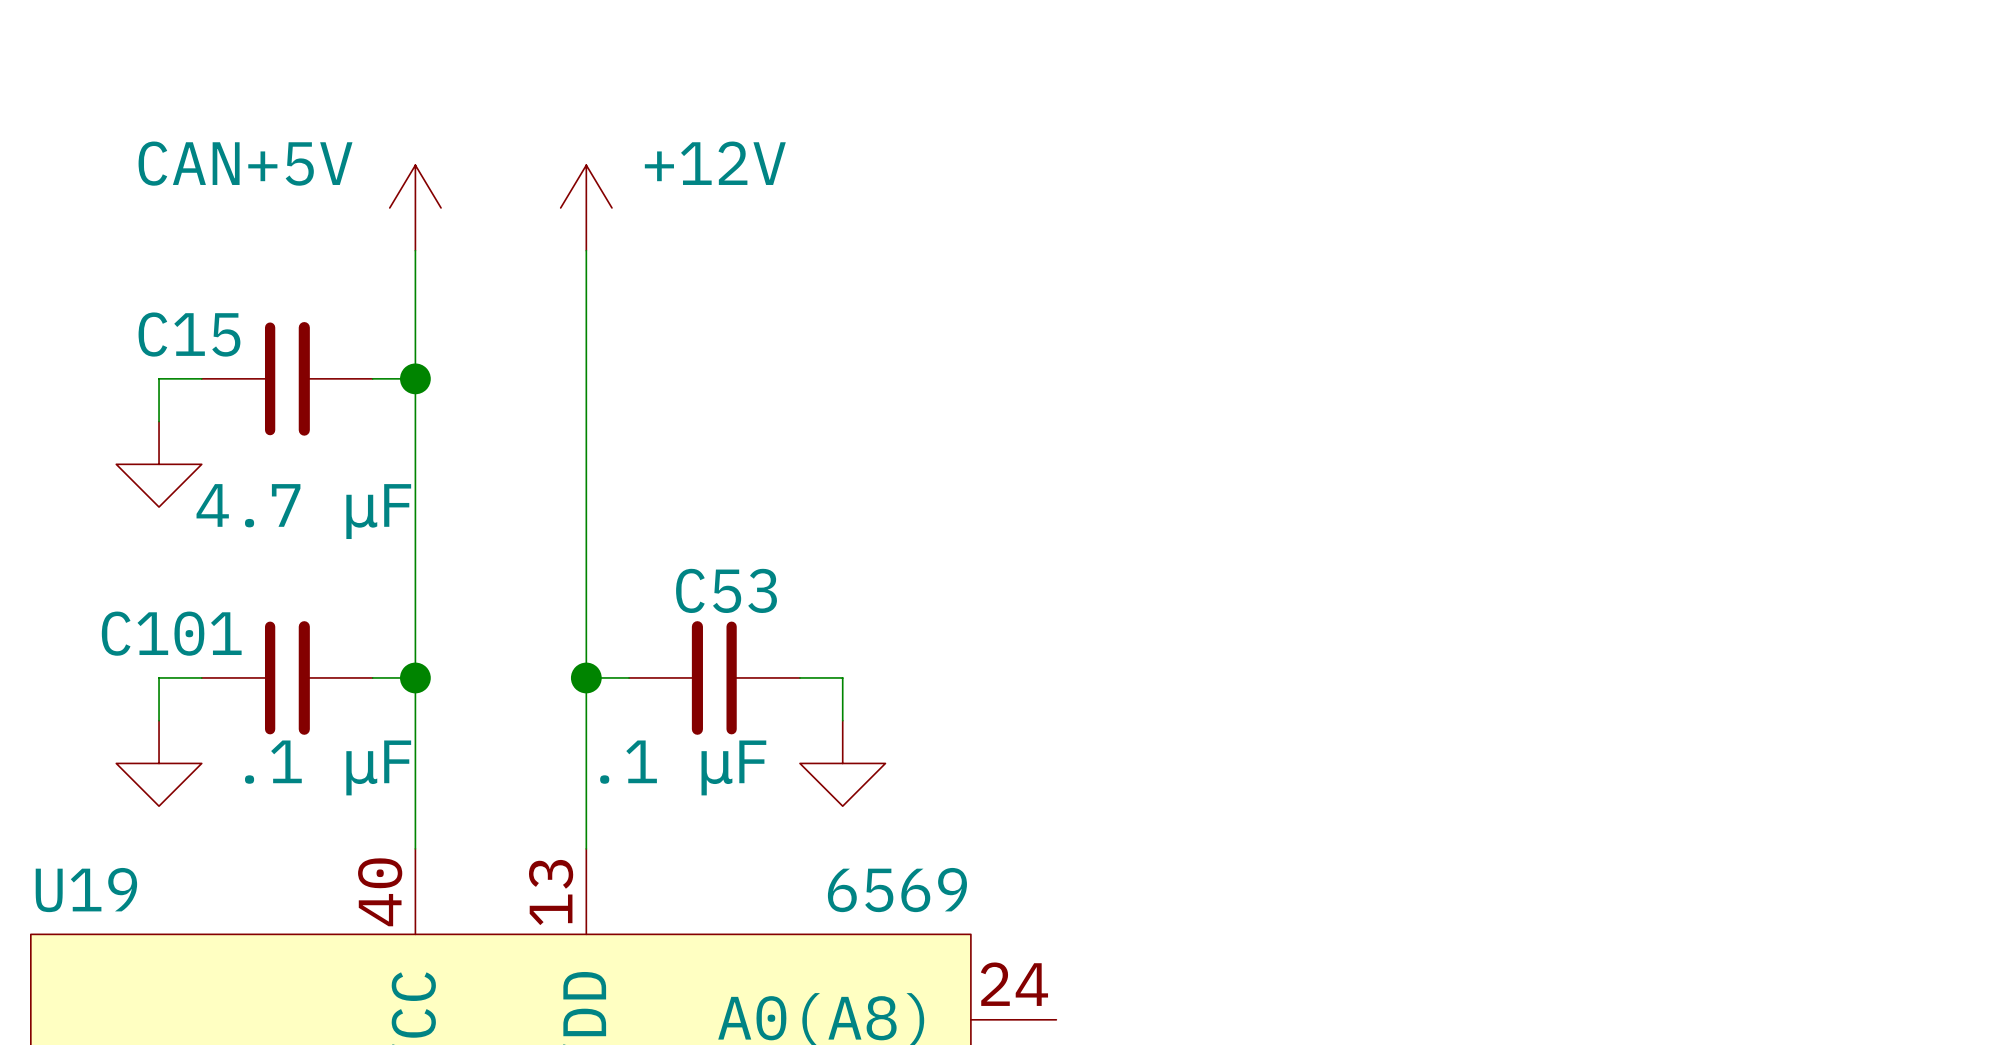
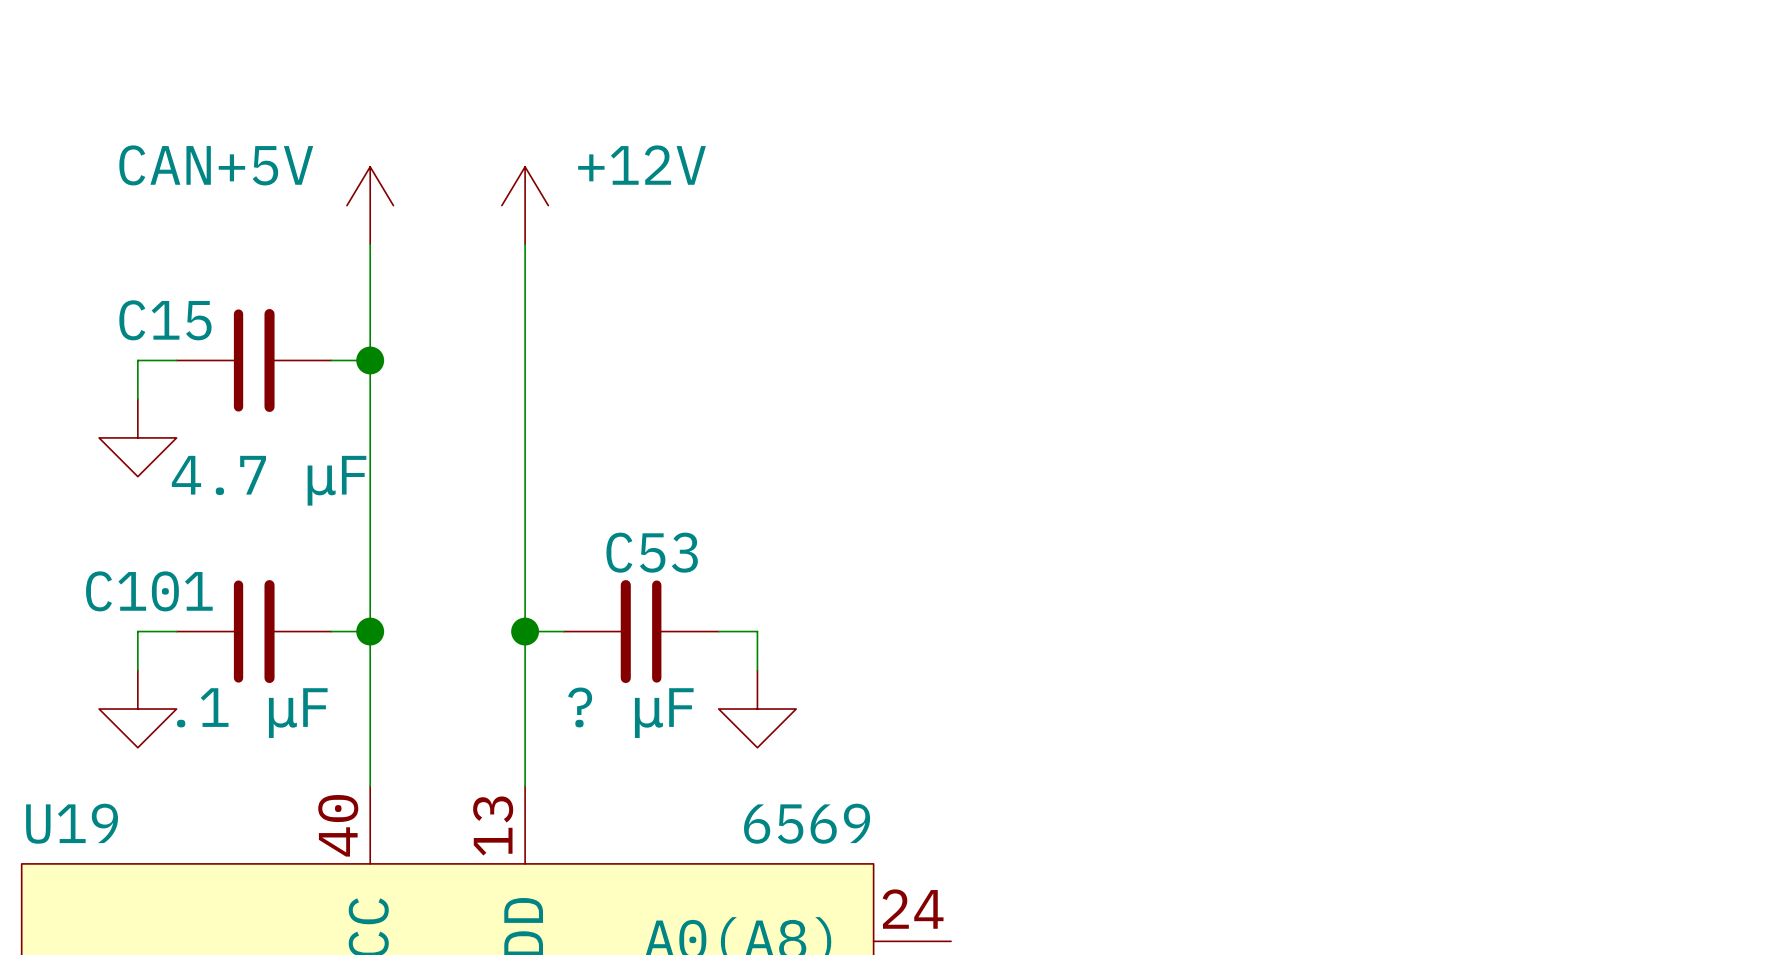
C101 value position: .1 μF (328, 767) -> .1 μF (252, 713)
C53 value: .1 μF (683, 767) -> ? μF (630, 712)

